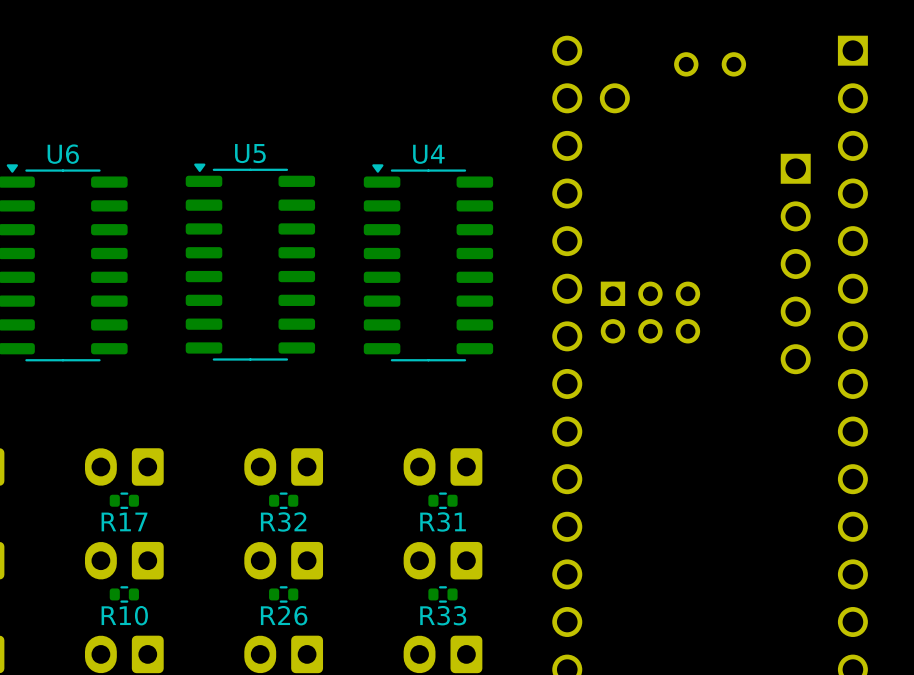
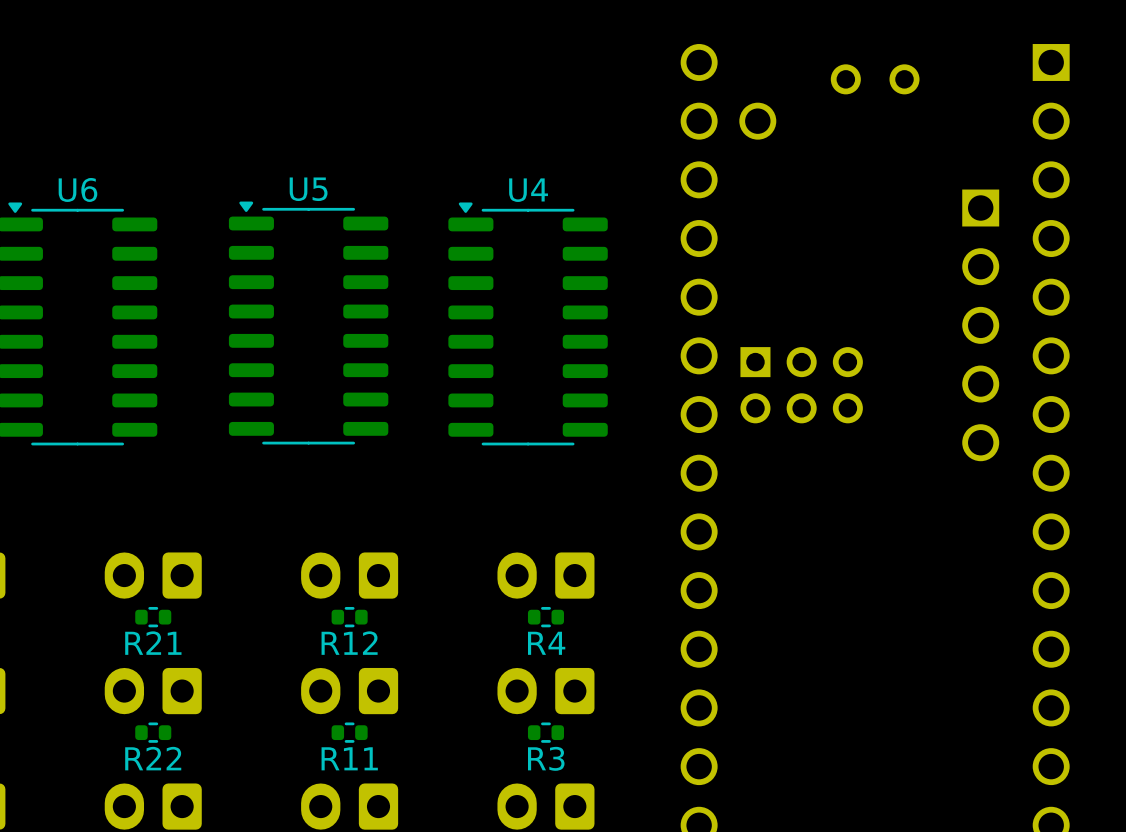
R17 name: R17 (124, 521) -> R21 (153, 643)
R32 name: R32 (283, 521) -> R12 (349, 643)
R31 name: R31 (443, 521) -> R4 (546, 643)
R10 name: R10 (124, 615) -> R22 (153, 758)
R26 name: R26 (284, 615) -> R11 (349, 758)
R33 name: R33 (443, 615) -> R3 (546, 758)

